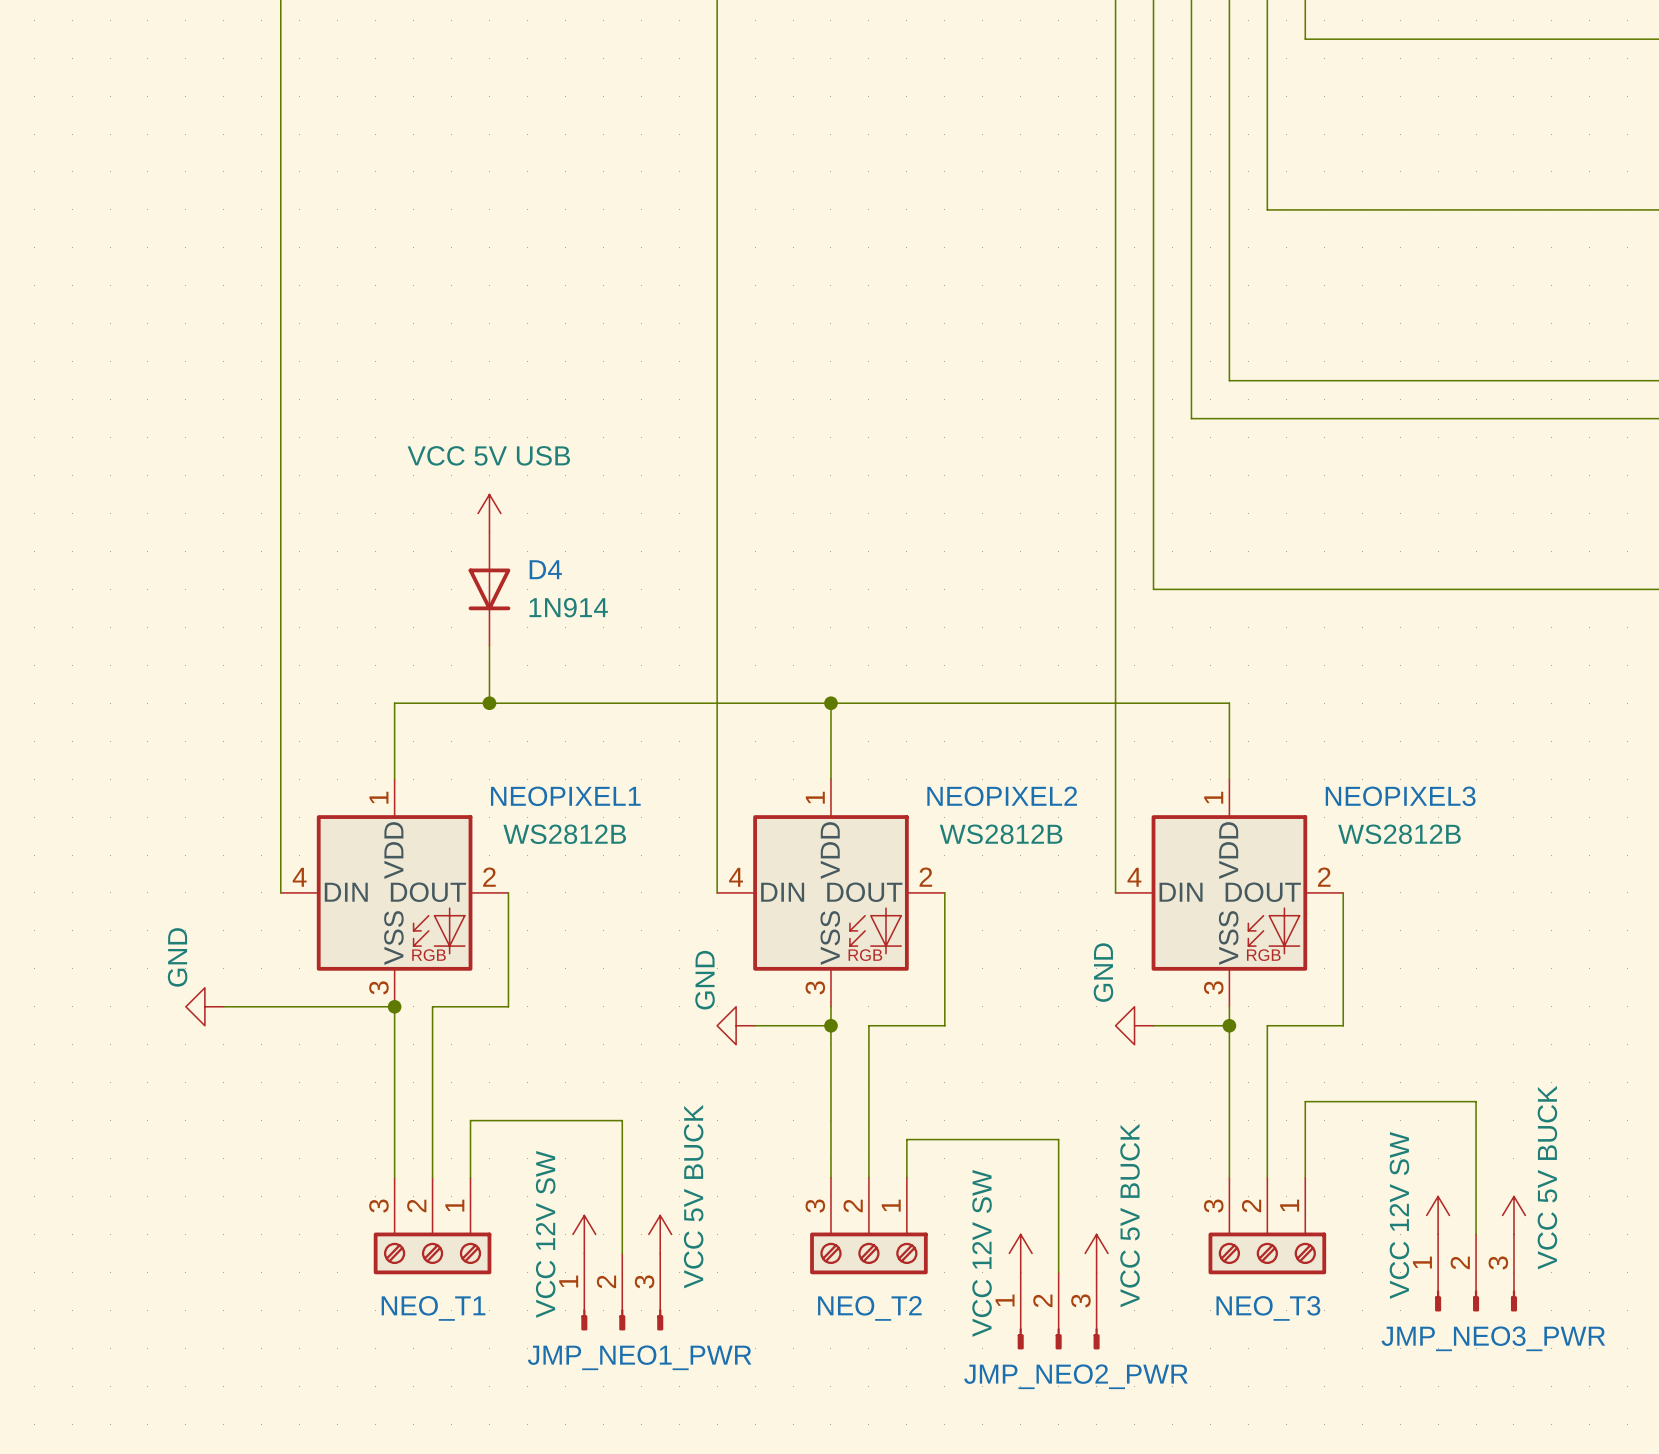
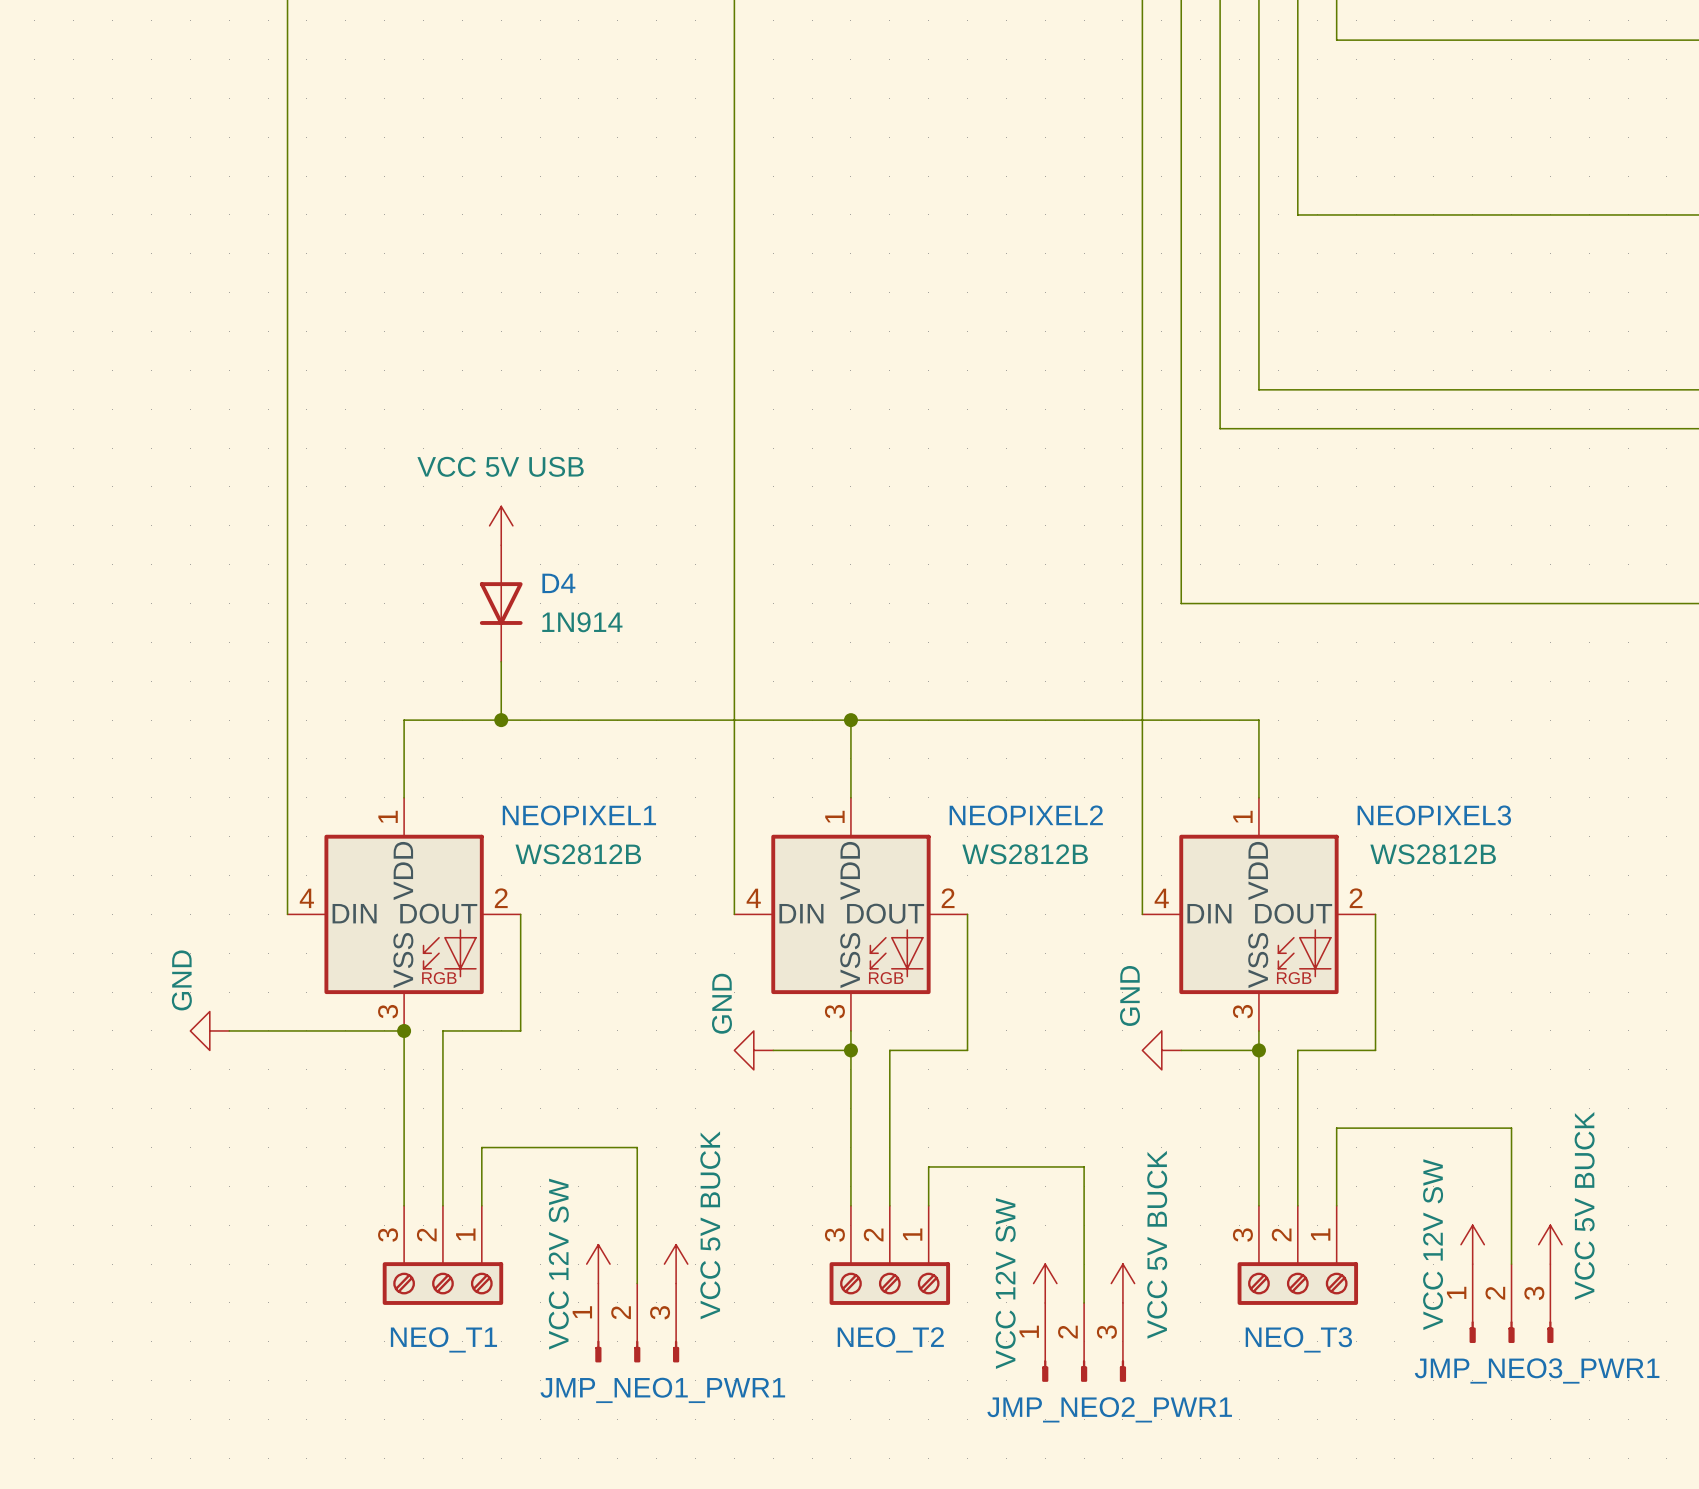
JMP_NEO3_PWR name: JMP_NEO3_PWR (1493, 1338) -> JMP_NEO3_PWR1 (1537, 1370)
JMP_NEO1_PWR name: JMP_NEO1_PWR (639, 1357) -> JMP_NEO1_PWR1 (662, 1390)
JMP_NEO2_PWR name: JMP_NEO2_PWR (1075, 1376) -> JMP_NEO2_PWR1 (1109, 1409)

